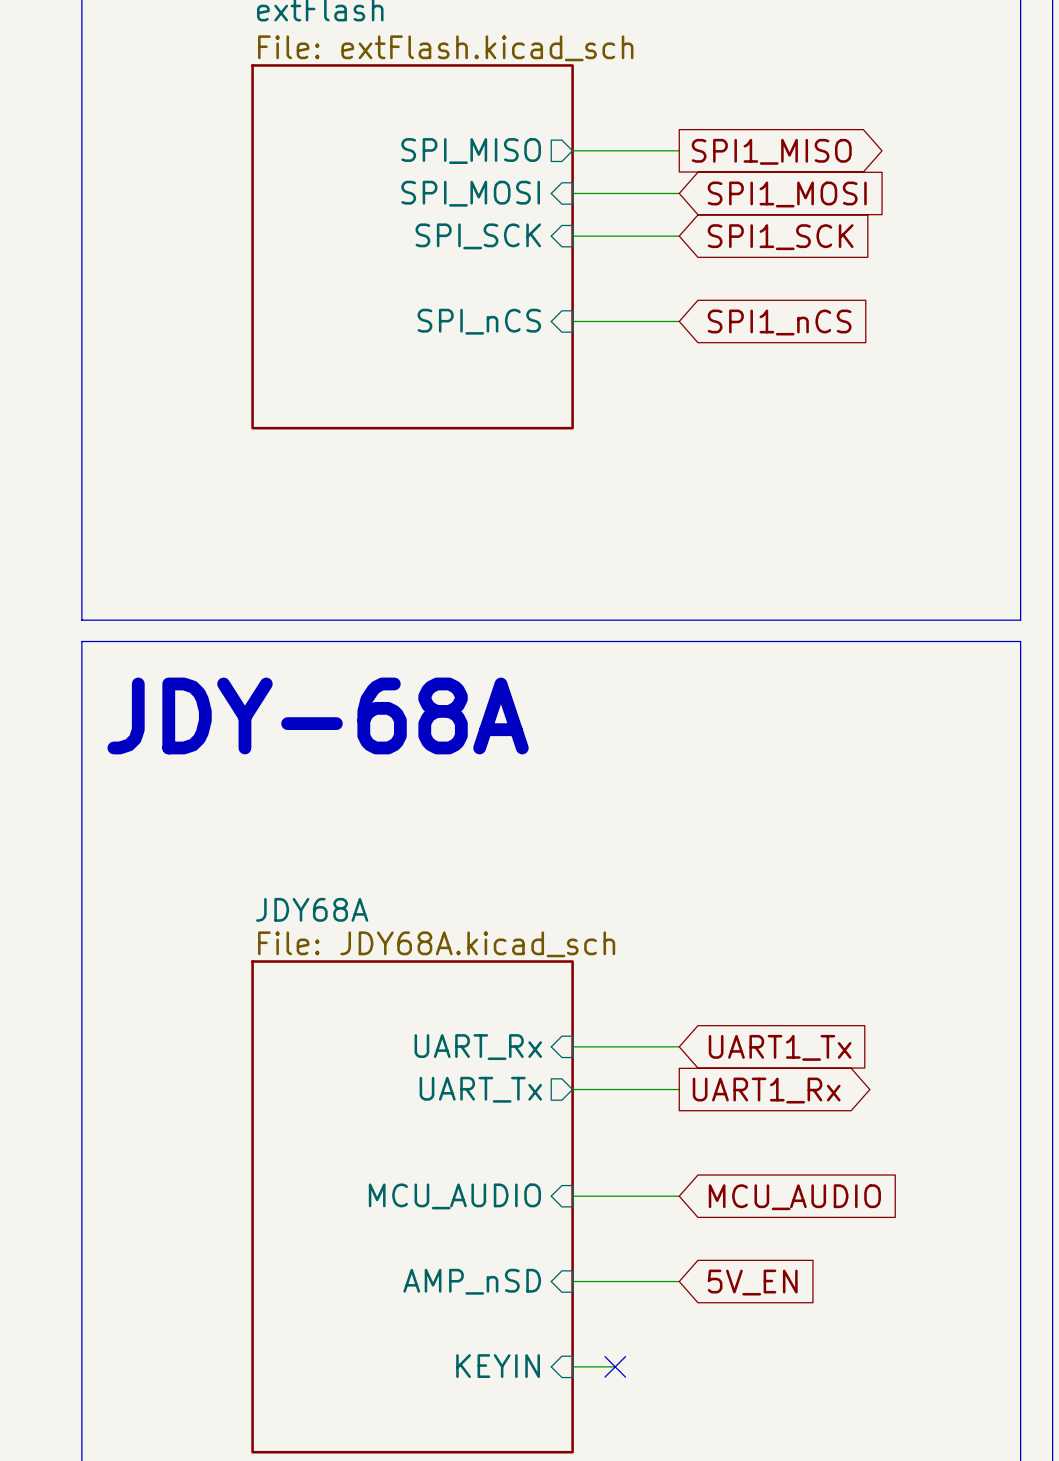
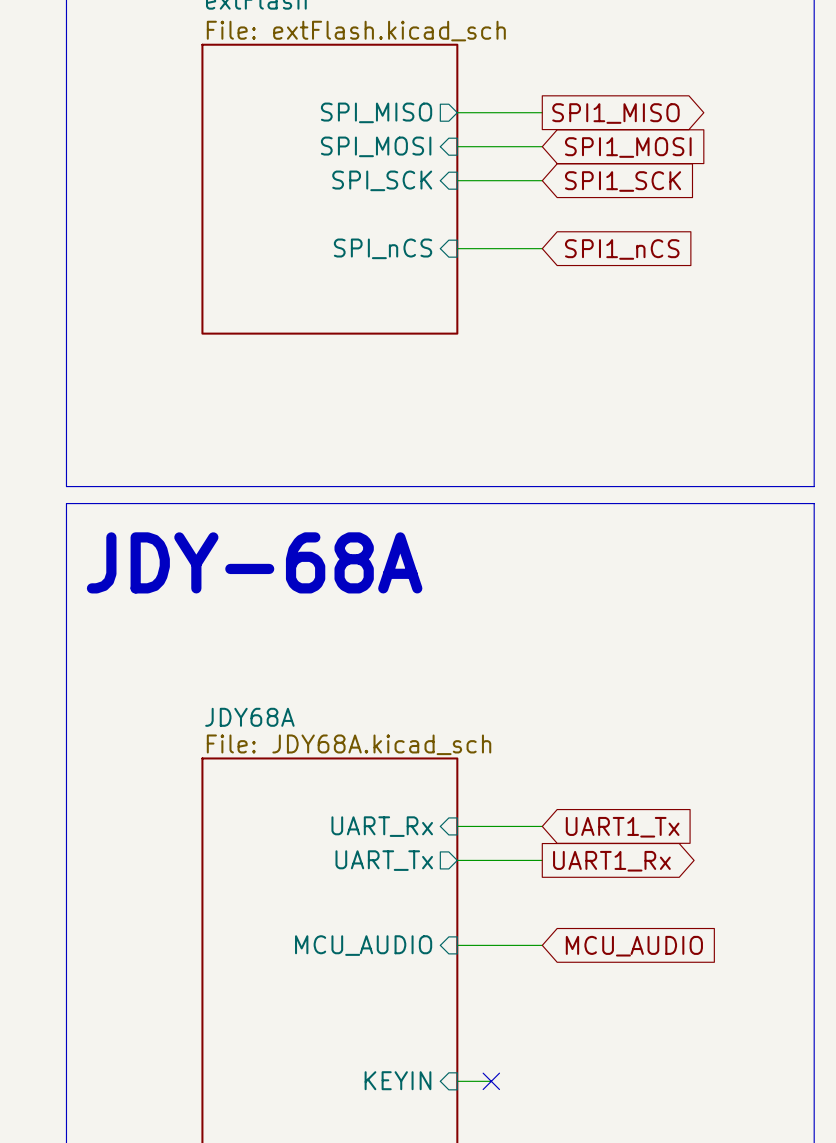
sheet pin: AMP_nSD (472, 1281) -> none
wire: (572, 1281) (679, 1281) -> none
global label: 5V_EN (752, 1282) -> none

